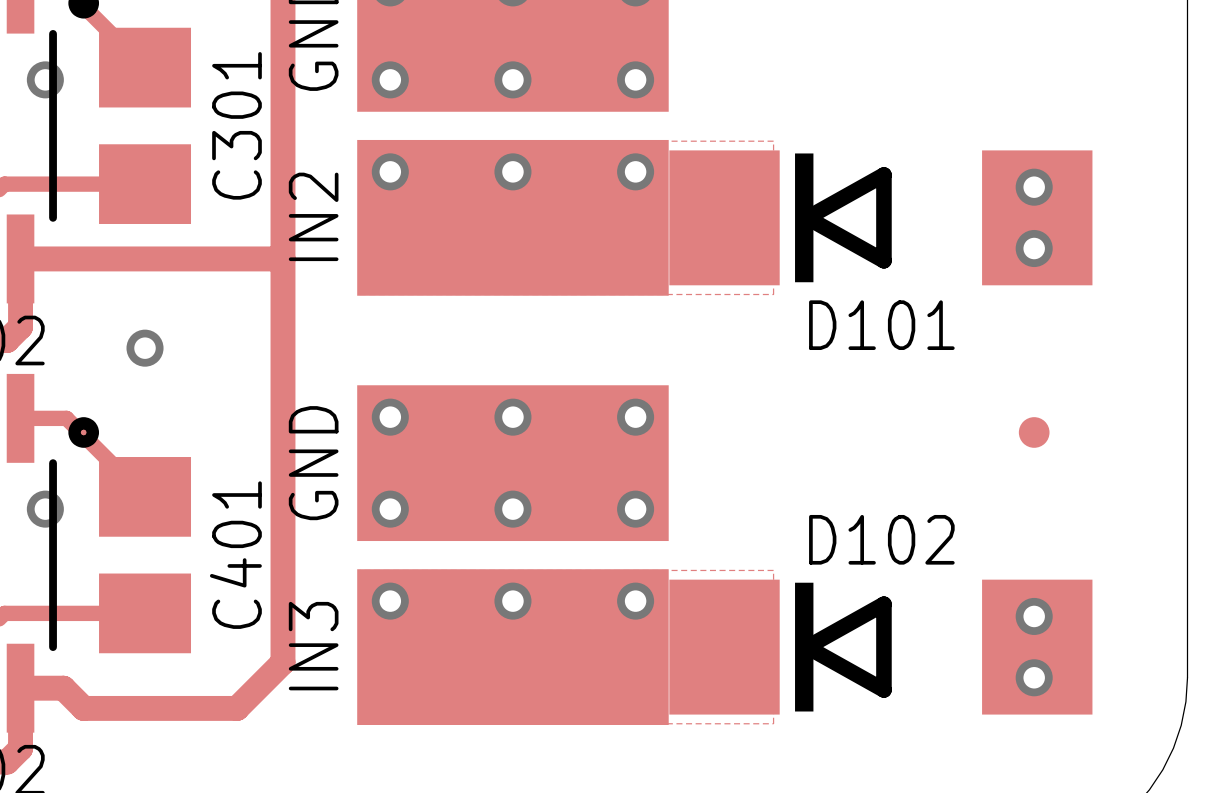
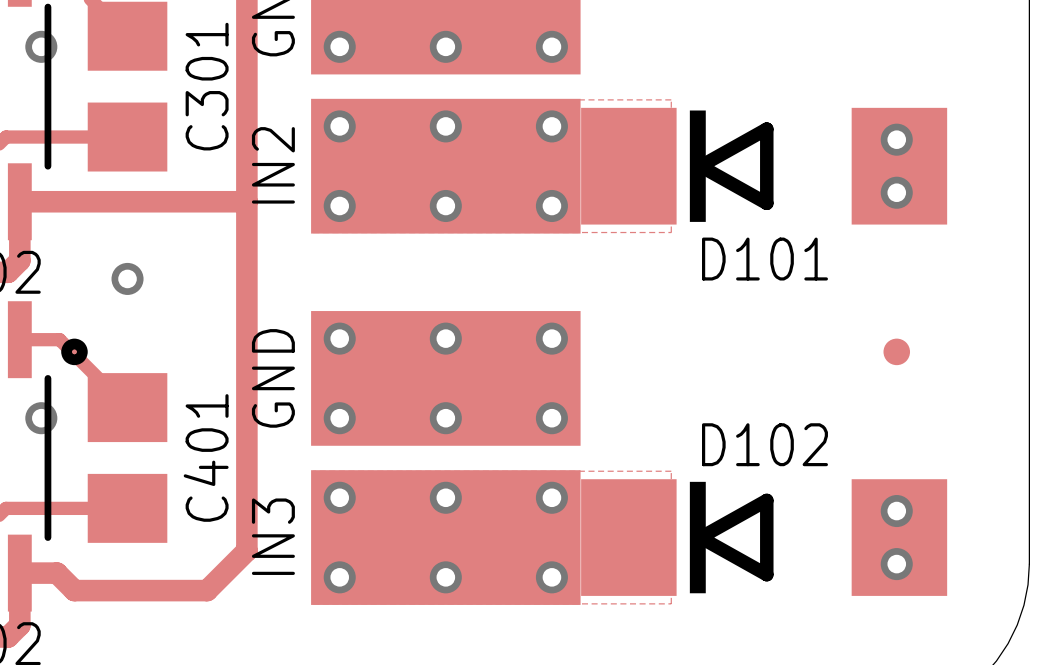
via: none -> (339, 205)
via: none -> (445, 205)
via: none -> (551, 205)
via: none -> (339, 577)
via: none -> (445, 577)
via: none -> (551, 577)

